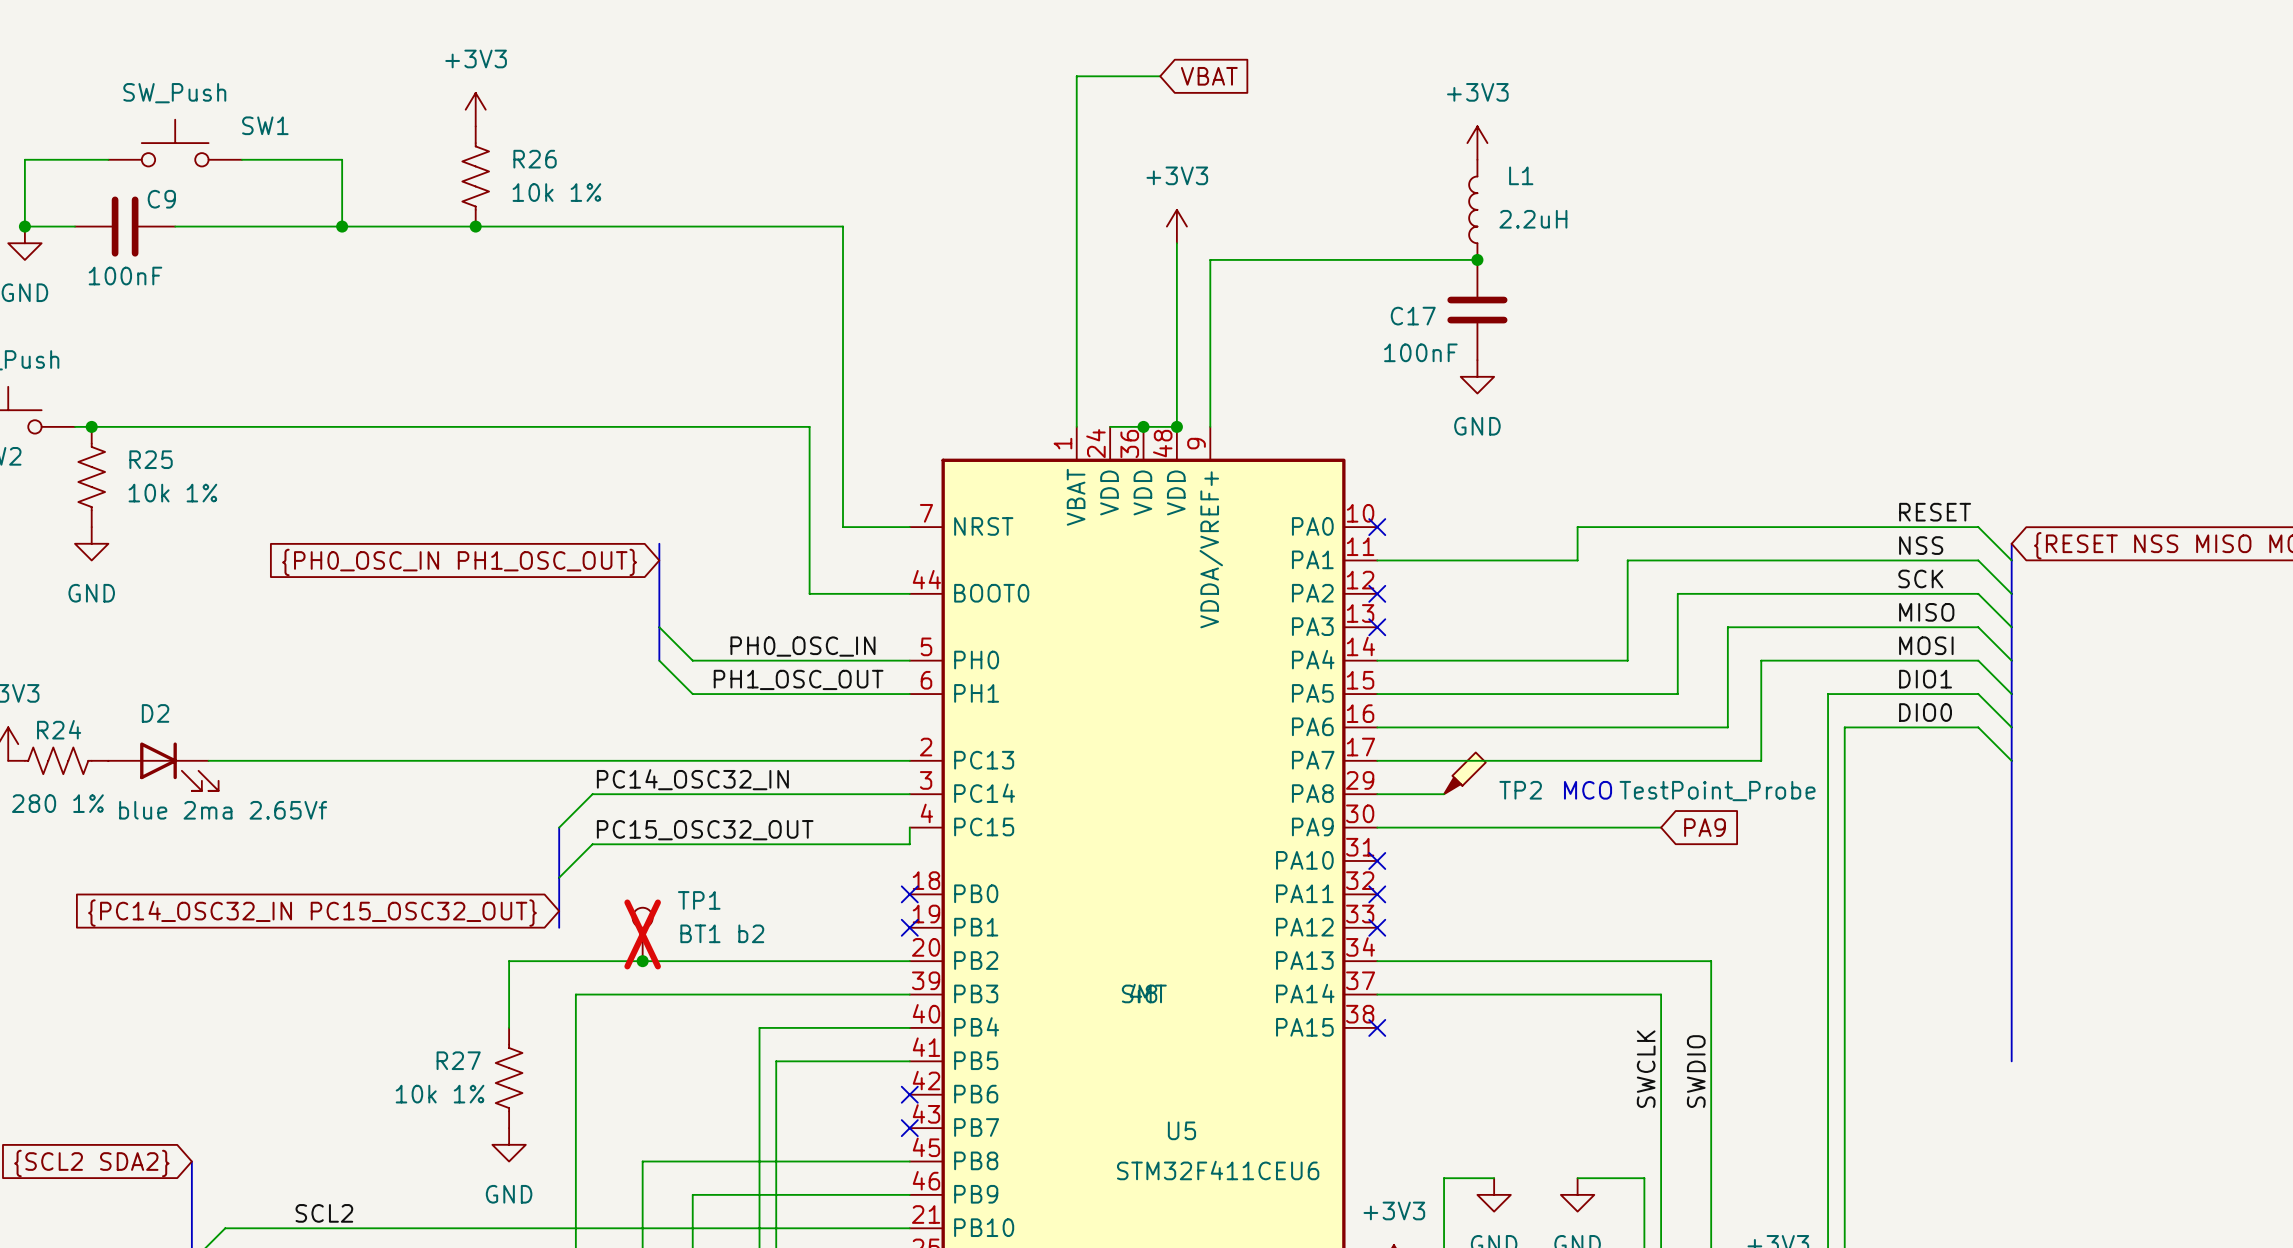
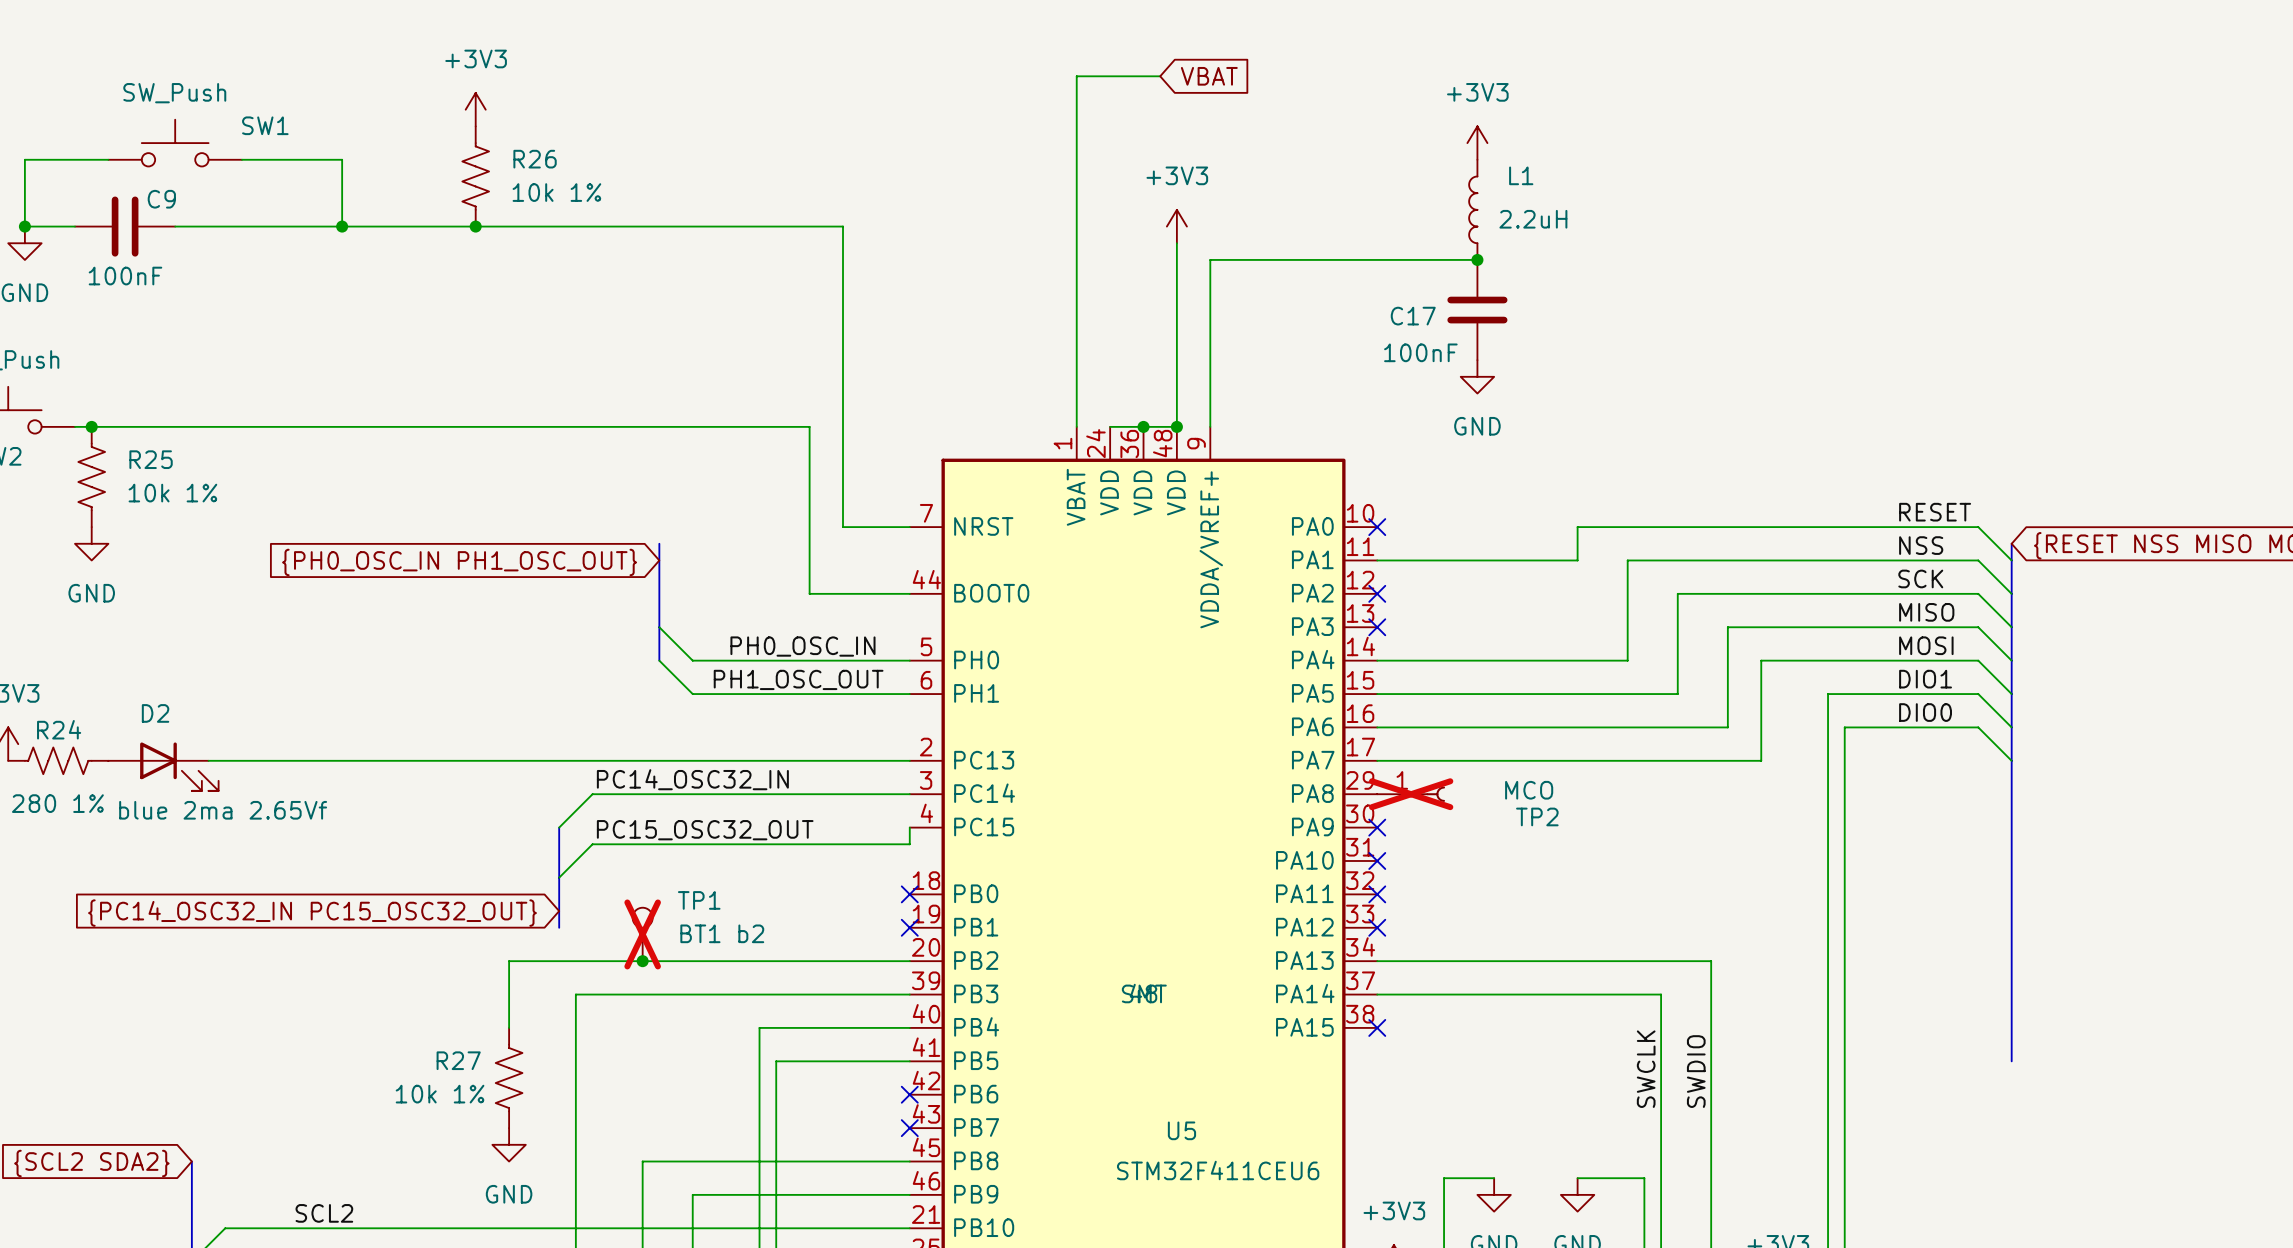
TP2 symbol: [1444, 752, 1486, 795] -> [1377, 786, 1446, 802]
TP2 name position: TP2 (1520, 790) -> TP2 (1537, 816)
text: MCO (1588, 790) -> none
TP2 value: TestPoint_Probe (1717, 791) -> MCO (1529, 790)
TP2 do-not-place cross: none -> (1411, 794)
wire: (1377, 827) (1661, 827) -> none
no-connect mark: none -> (1377, 827)
global label: PA9 (1705, 827) -> none

